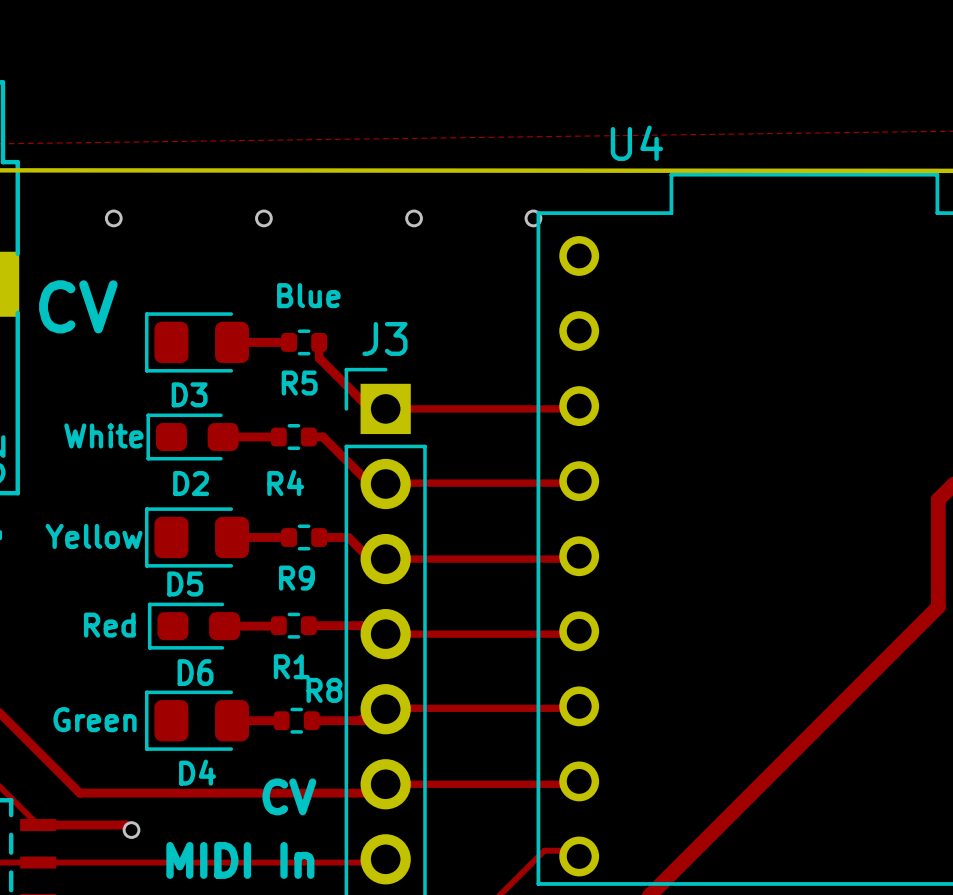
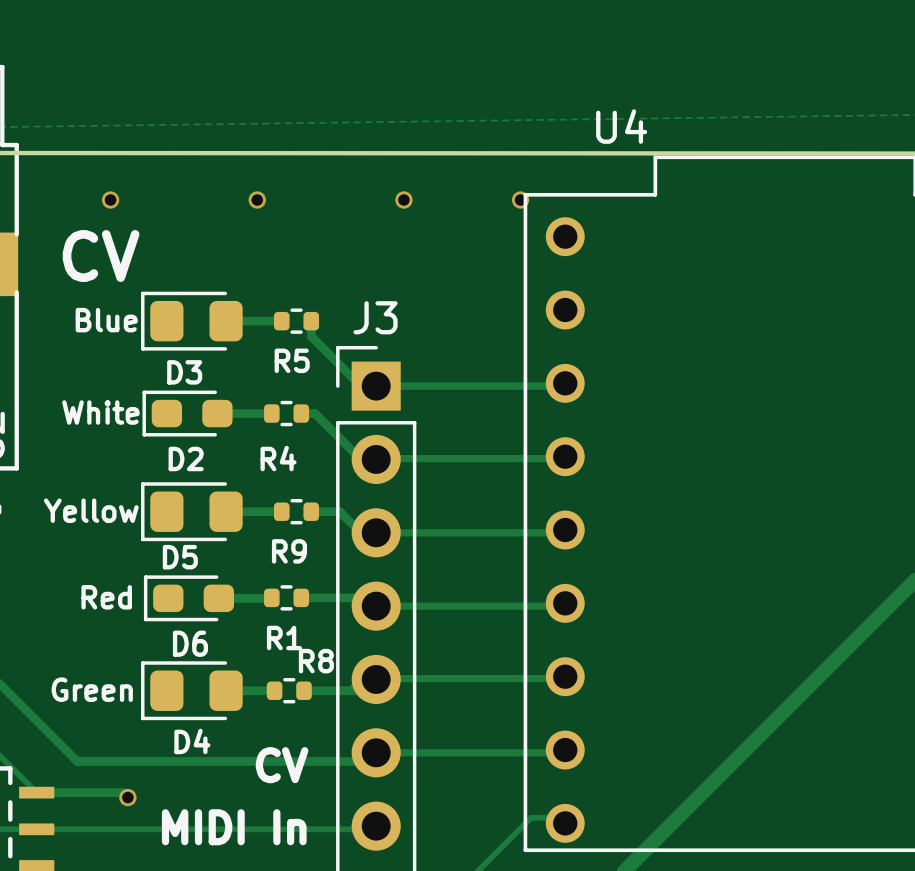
text position: Blue (308, 295) -> Blue (106, 320)
text position: CV (78, 306) -> CV (101, 256)

